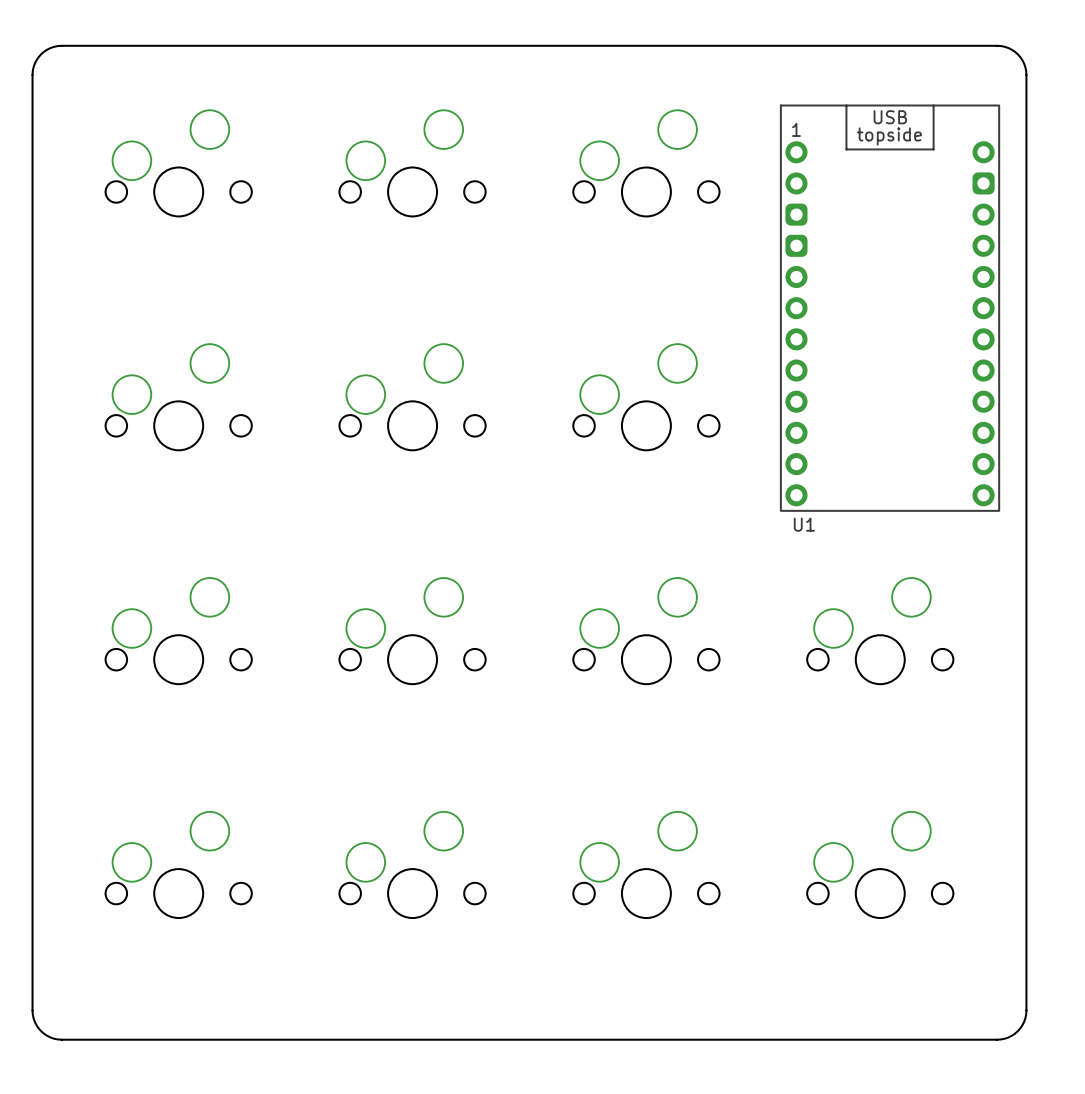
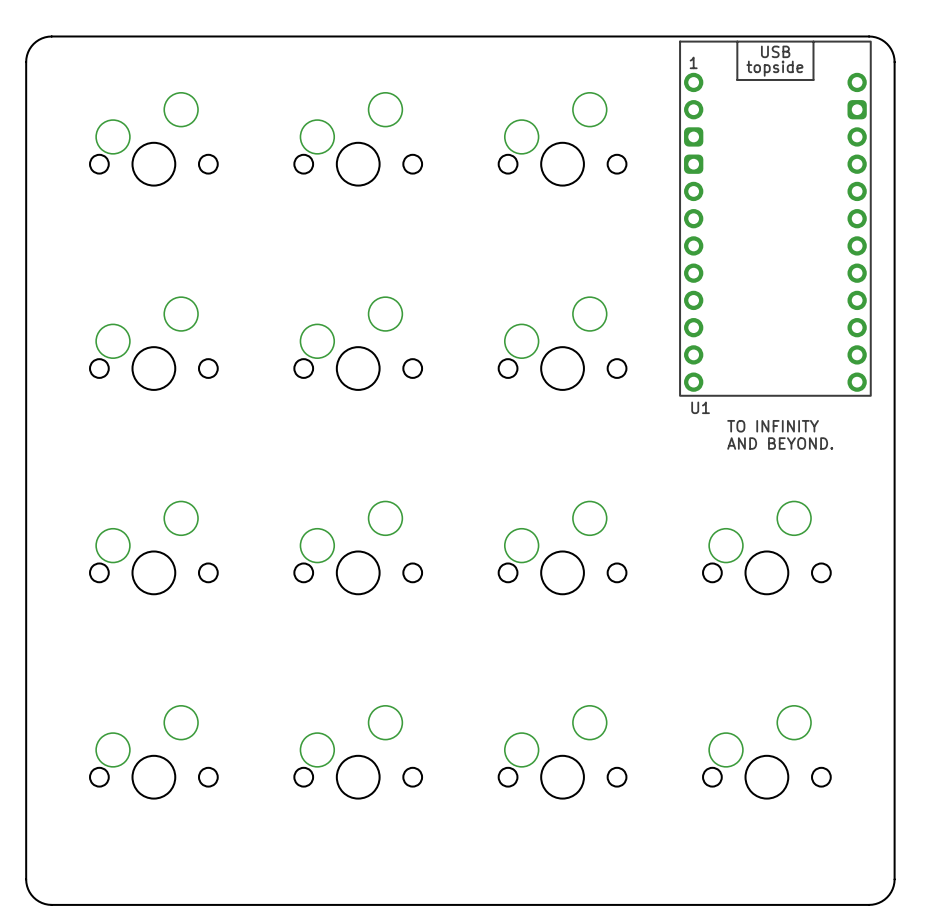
U1 position: (890, 308) -> (775, 218)
text: none -> TO INFINITY (773, 426)
text: none -> AND BEYOND. (780, 443)

